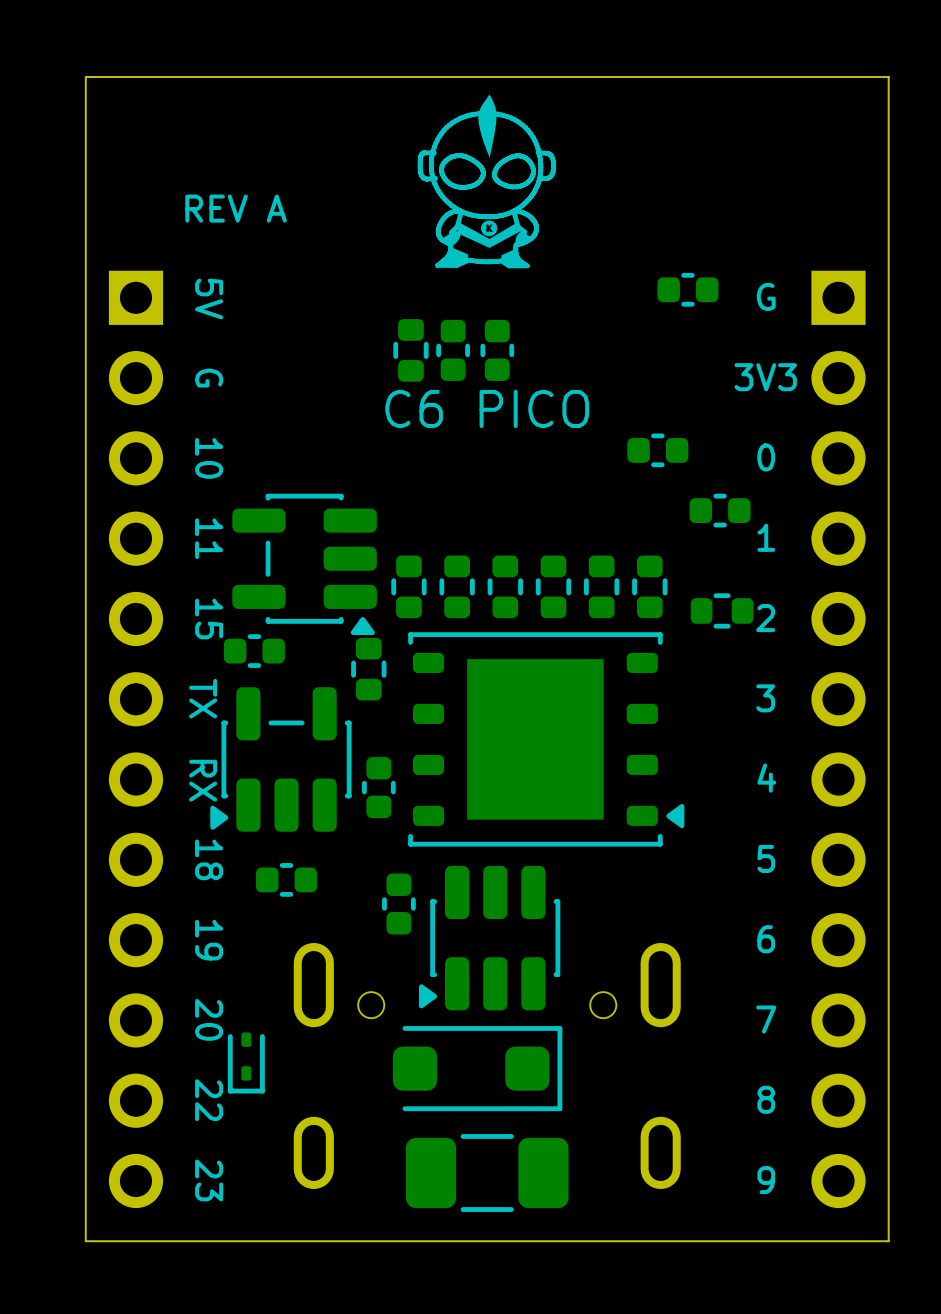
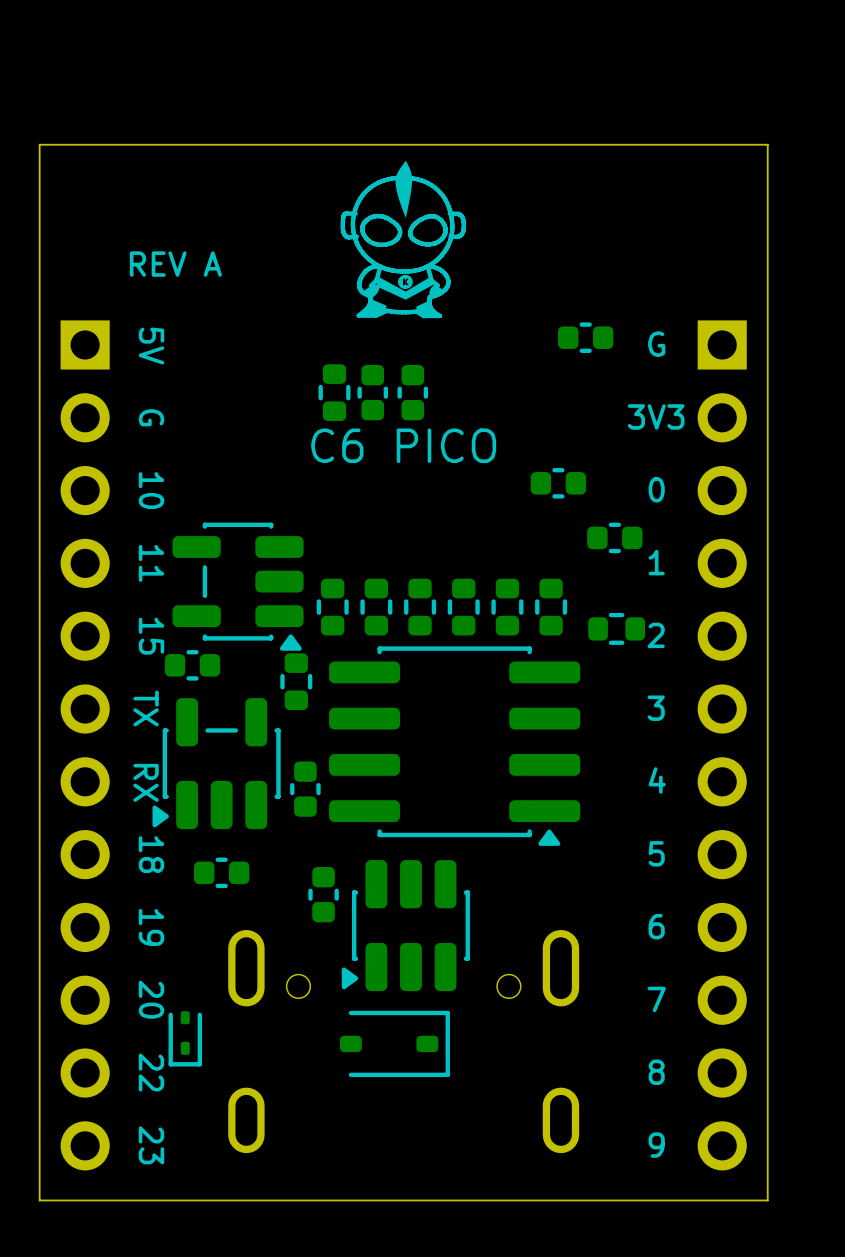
part footprint: [408, 632, 685, 847] -> [329, 646, 581, 846]
part footprint: [392, 1026, 563, 1112] -> [339, 1010, 450, 1078]
part: (487, 1172) -> none

